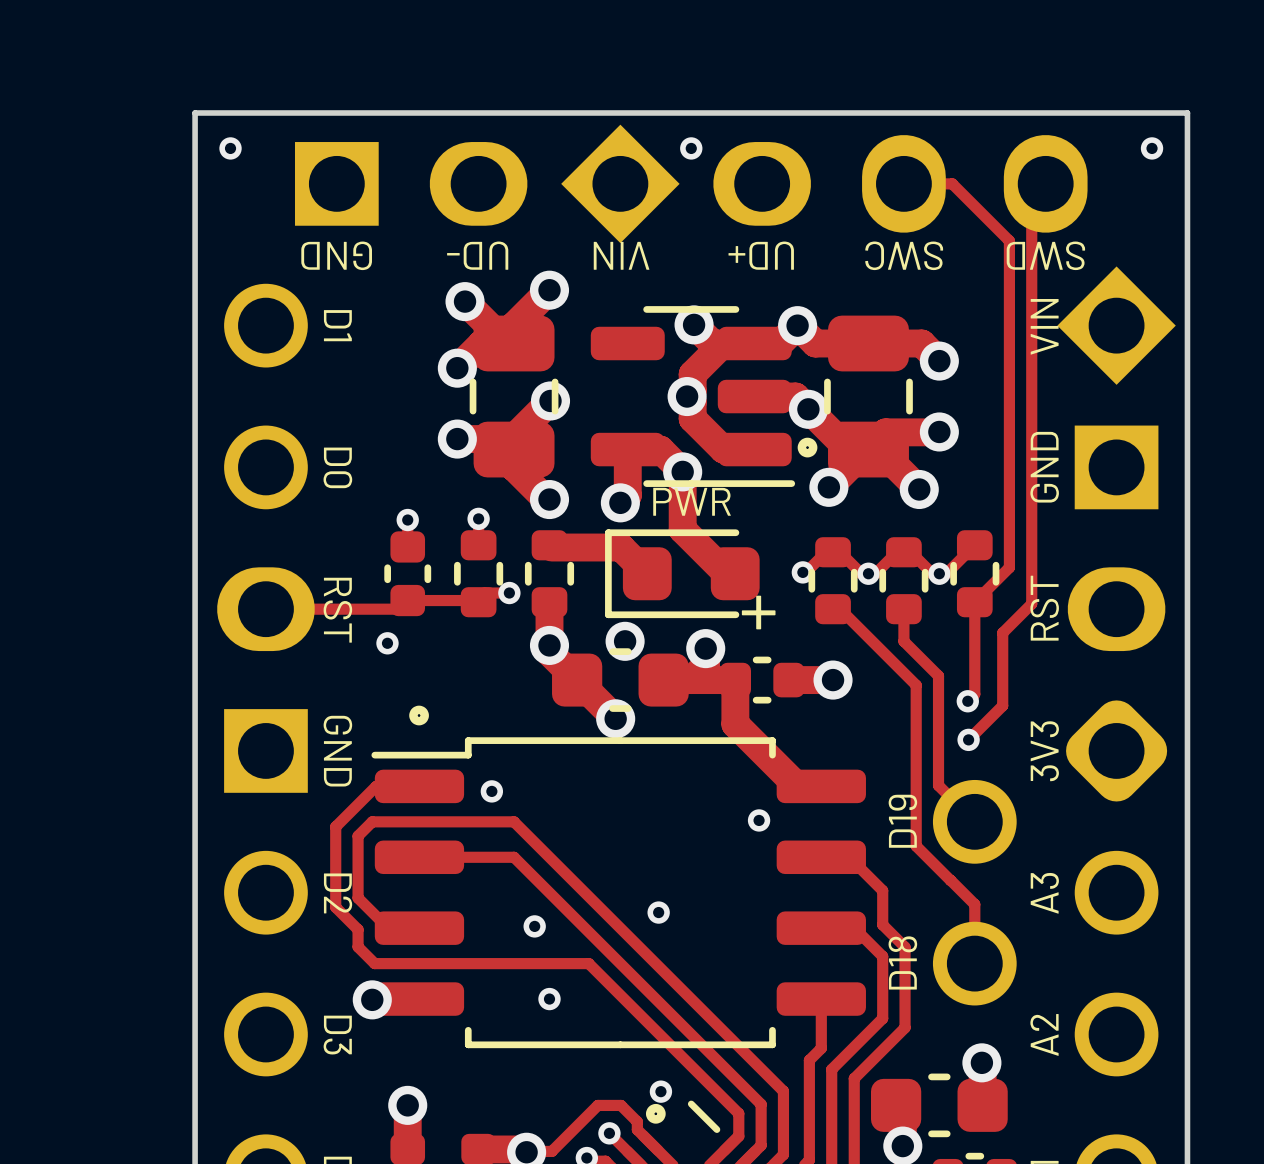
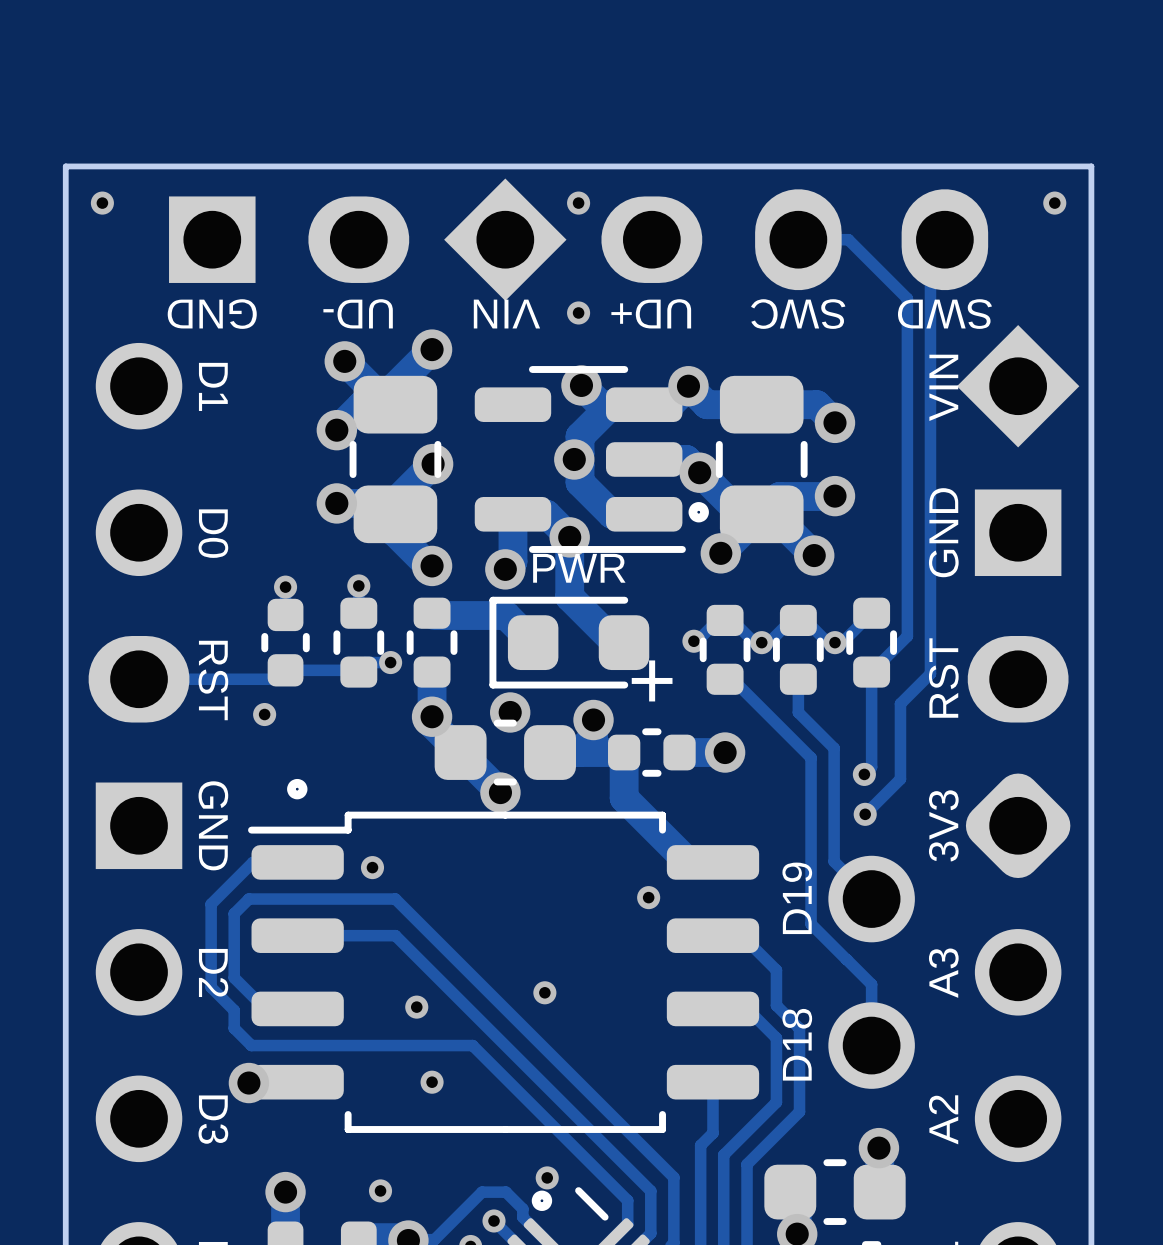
via: none -> (578, 312)
via: none -> (380, 1190)

